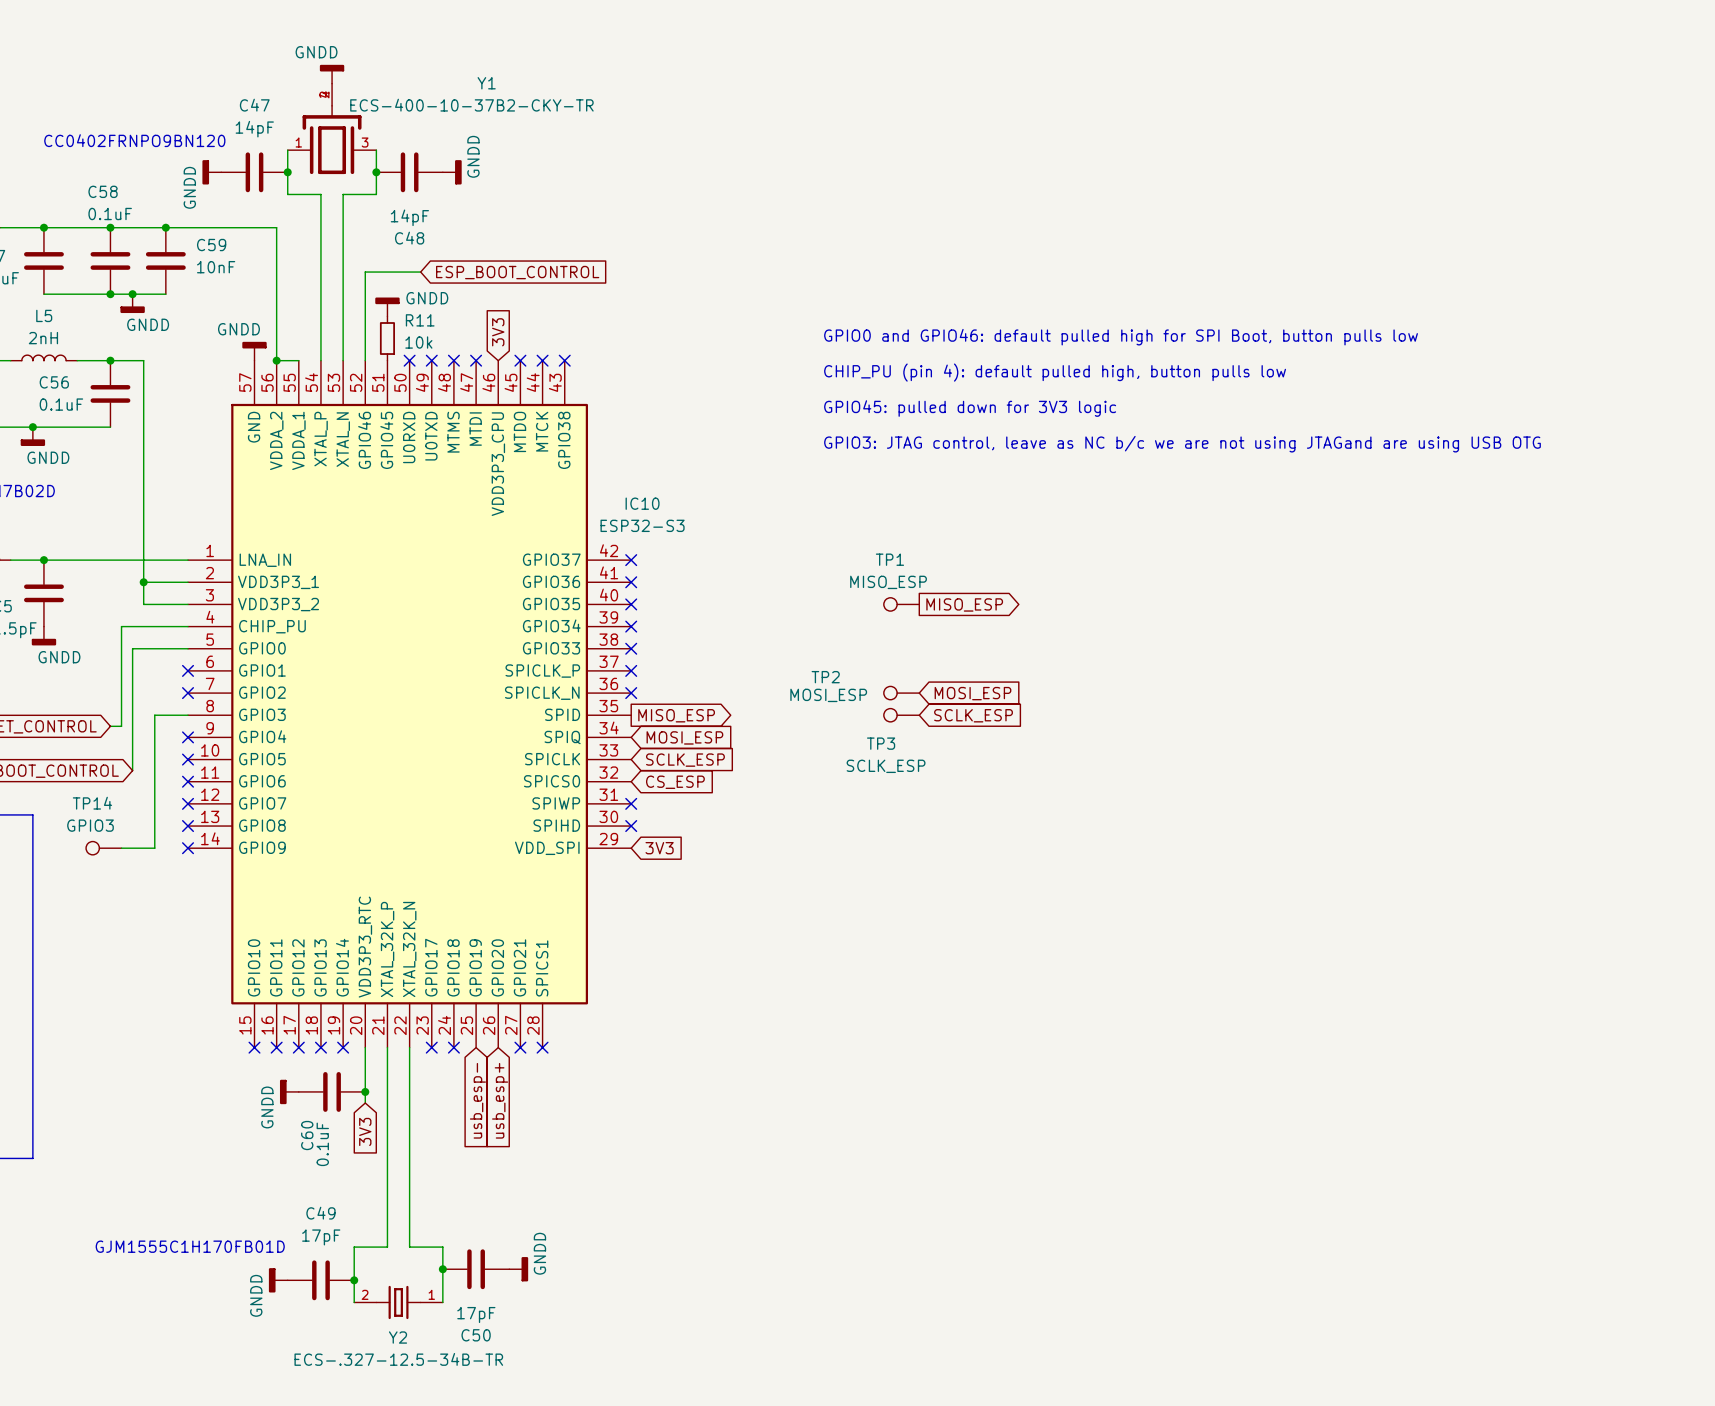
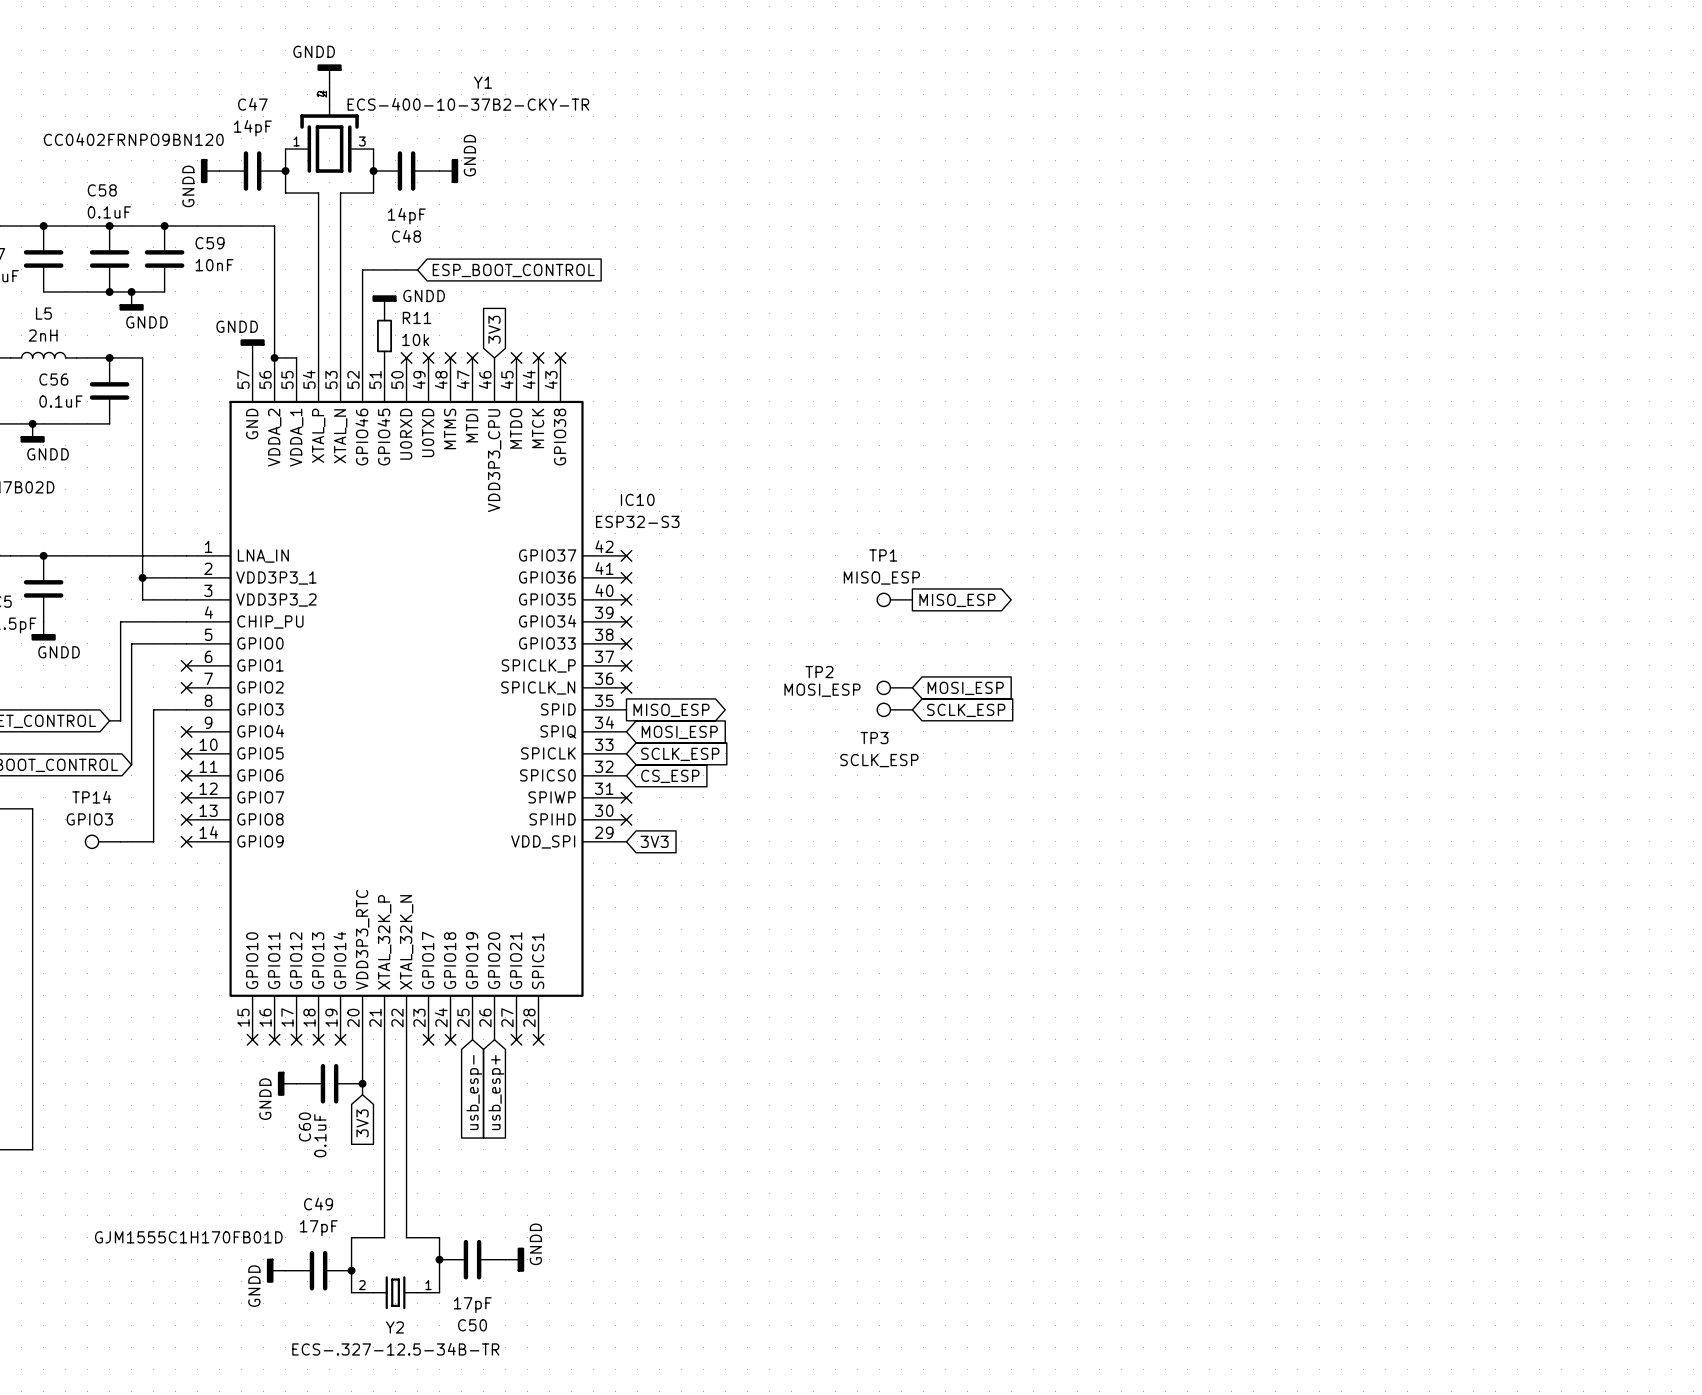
text: GPIO0 and GPIO46: default pulled high for SPI Boot, button pulls low (1121, 337) -> none
text: CHIP_PU (pin 4): default pulled high, button pulls low (1055, 372) -> none
text: GPIO45: pulled down for 3V3 logic (970, 408) -> none
text: GPIO3: JTAG control, leave as NC b/c we are not using JTAGand are using USB OTG (1182, 444) -> none

